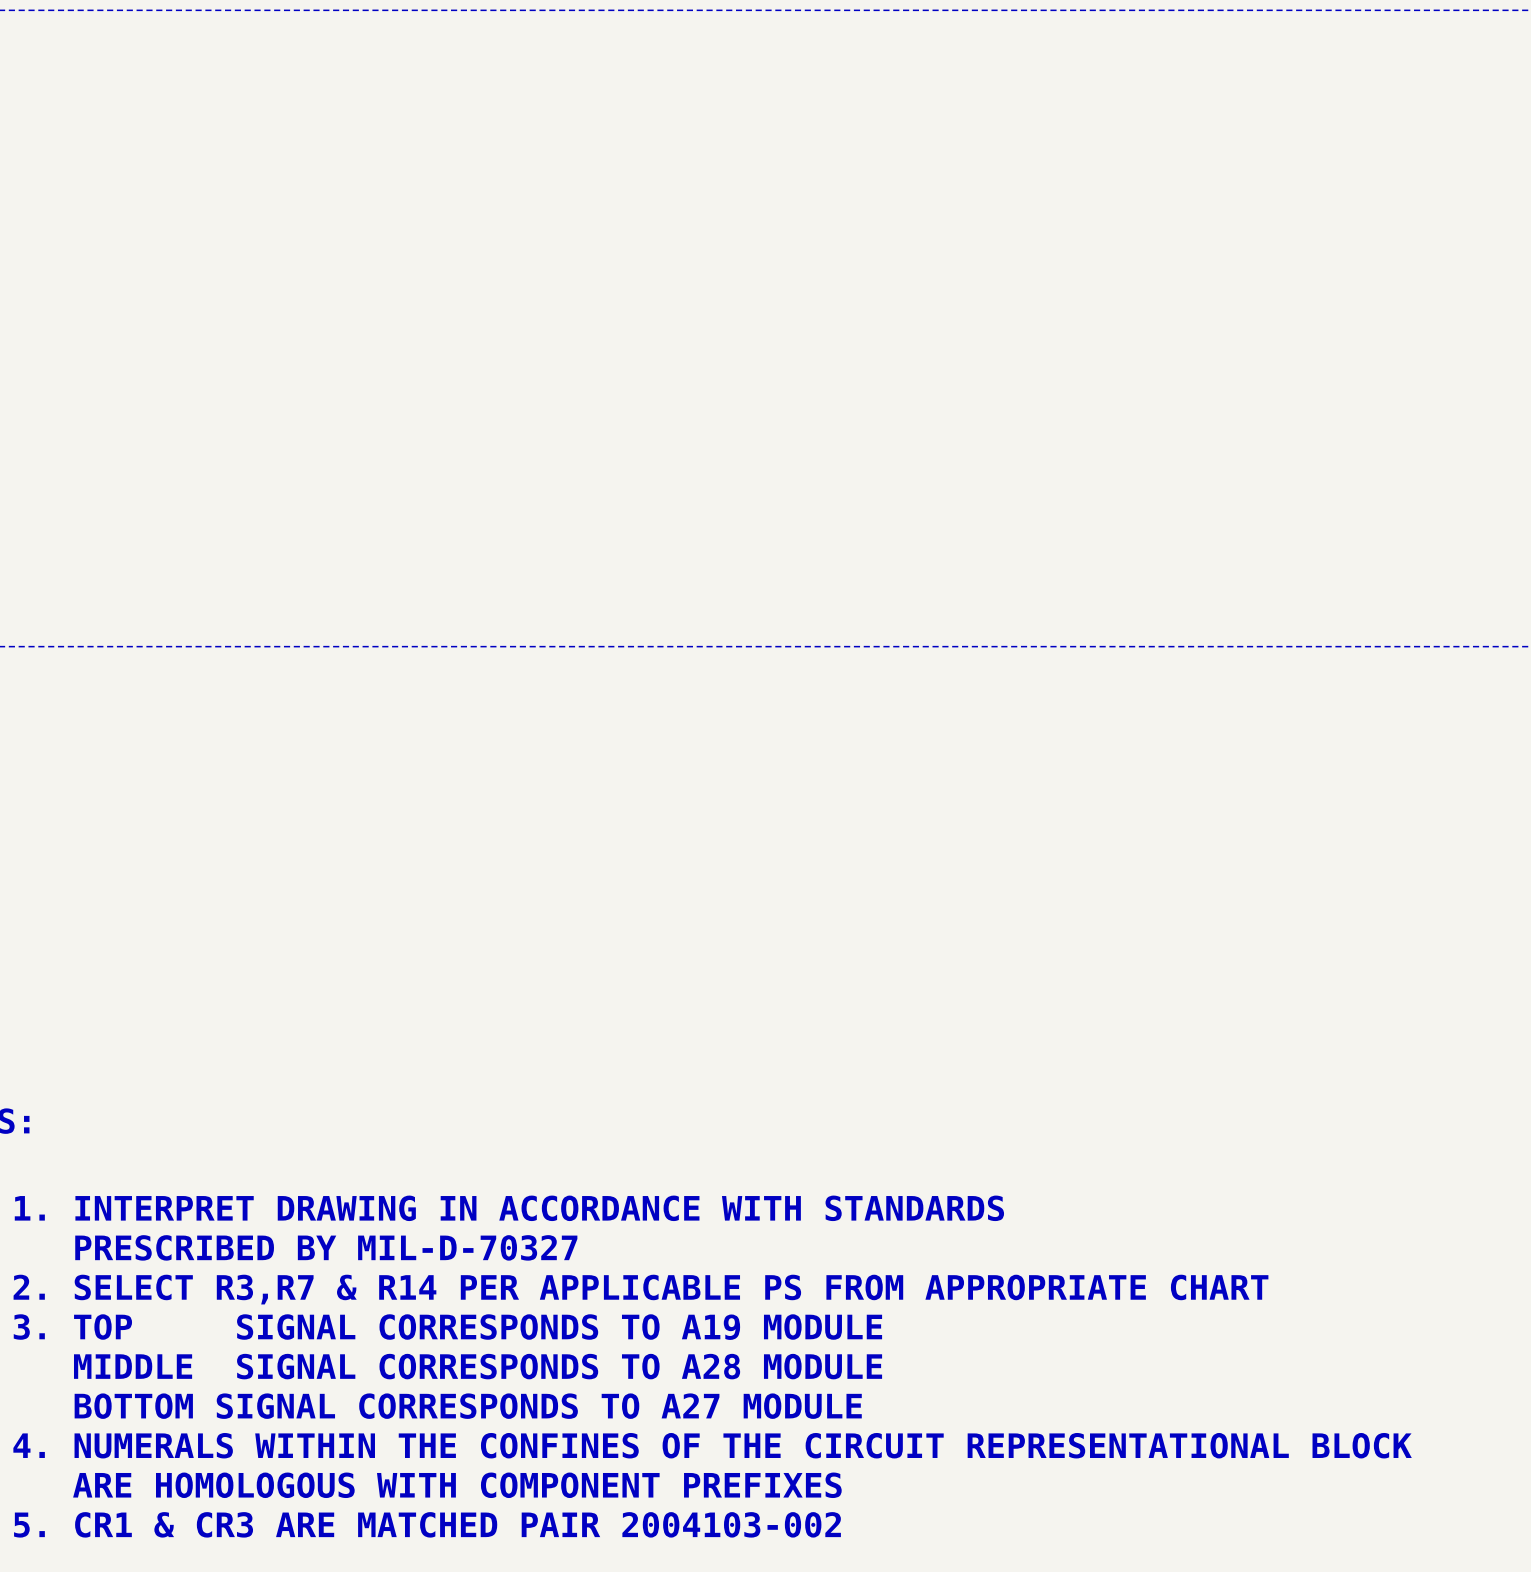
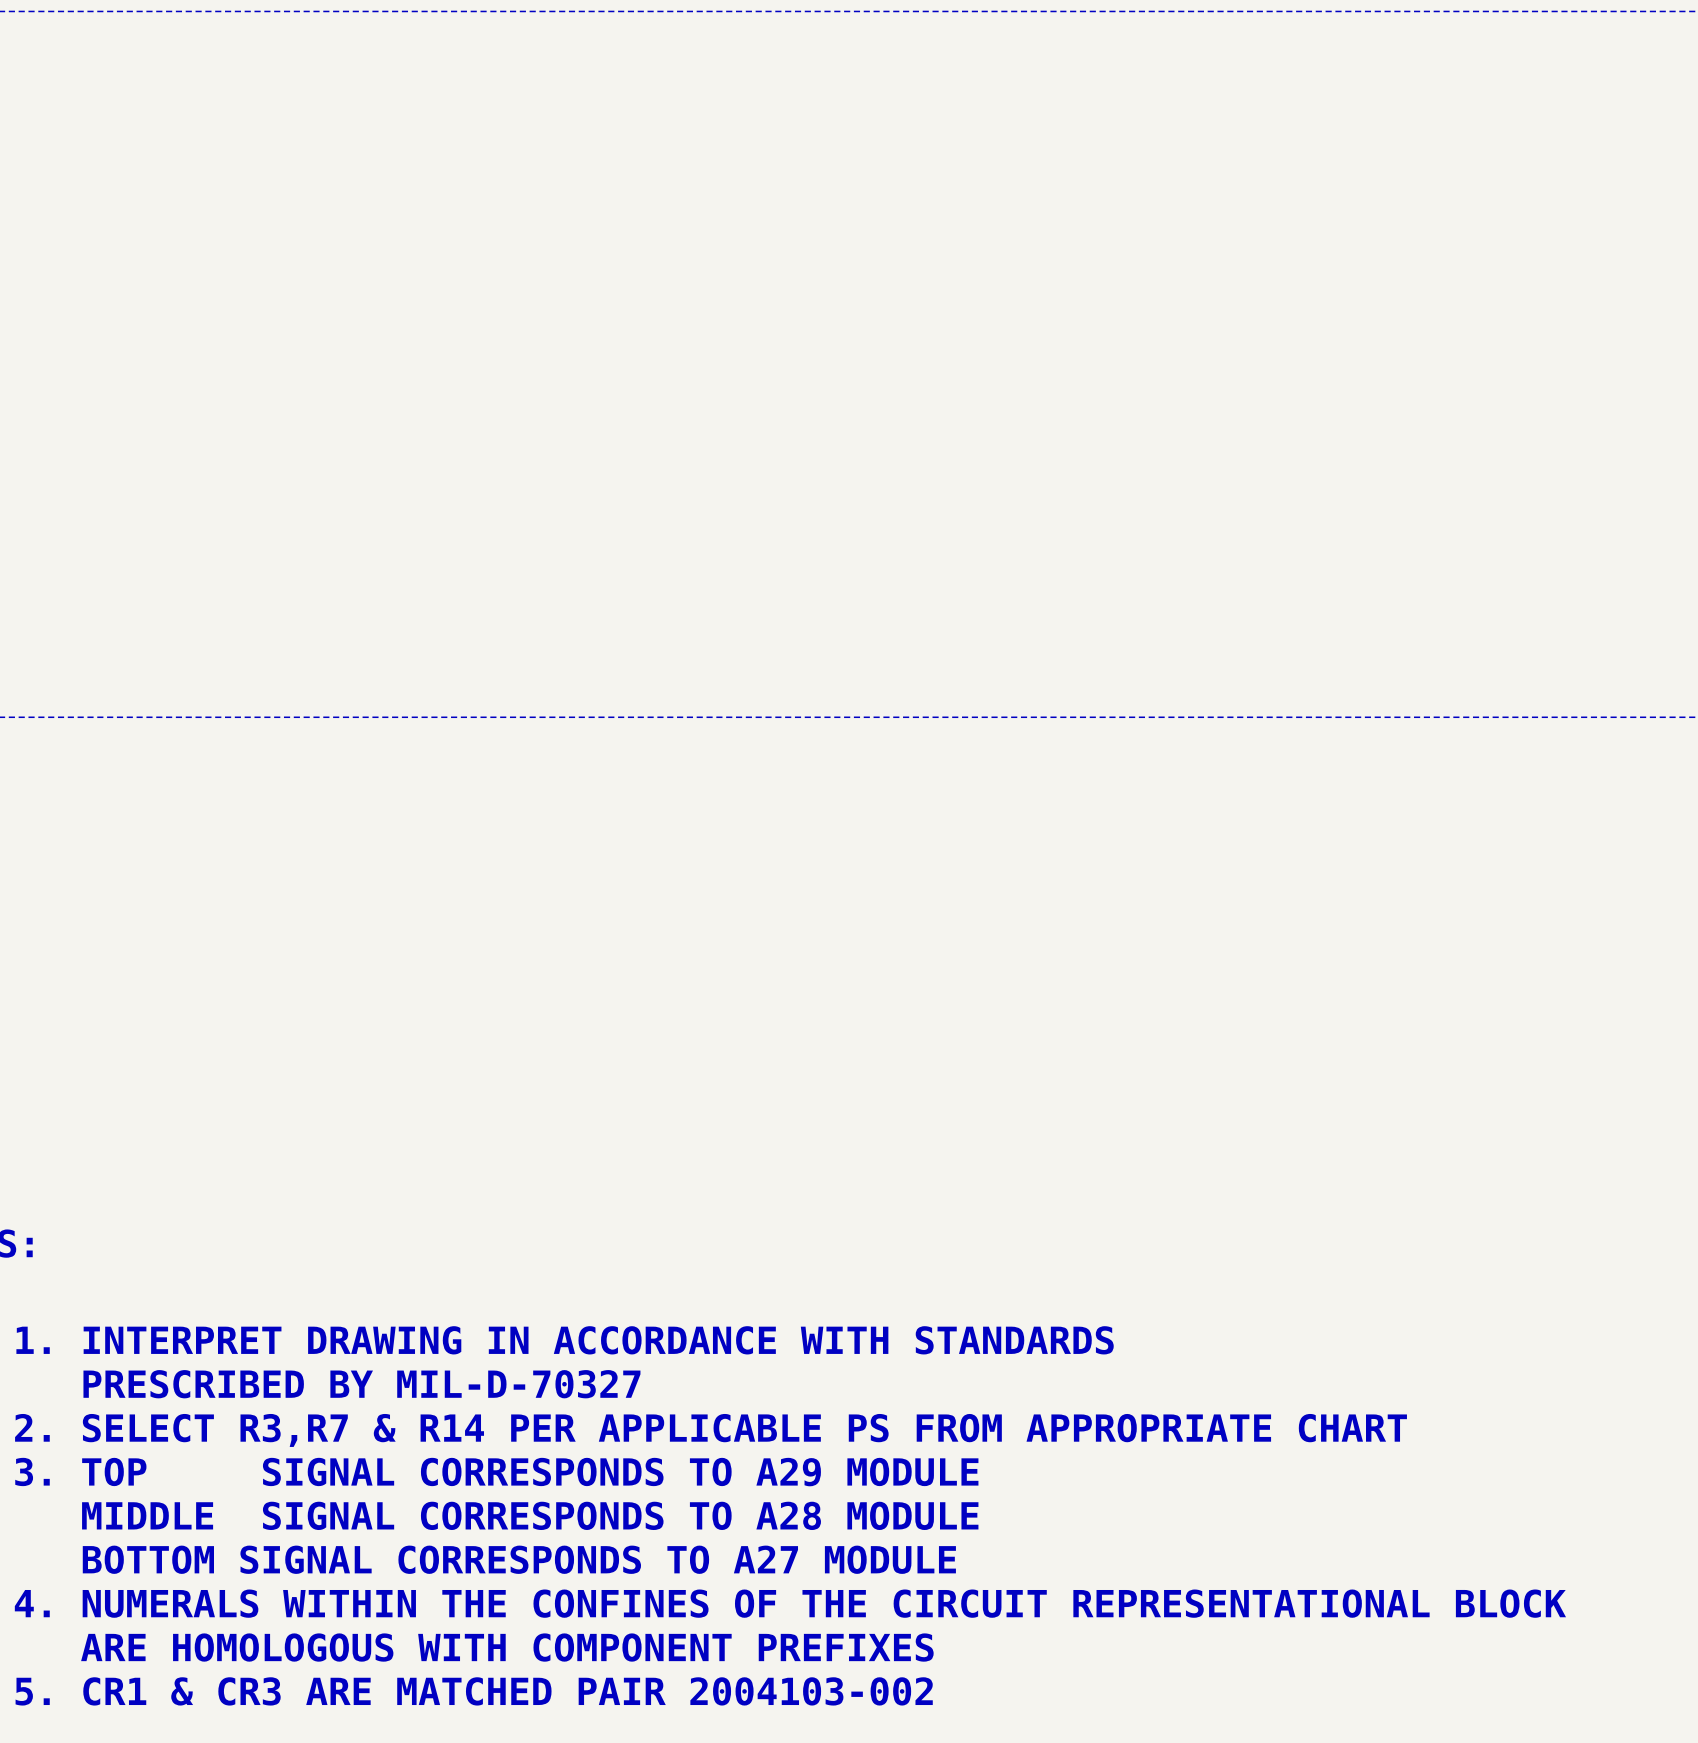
text: 3. TOP SIGNAL CORRESPONDS TO A19 MODULE (447, 1327) -> 3. TOP SIGNAL CORRESPONDS TO A29 MODULE (496, 1472)

